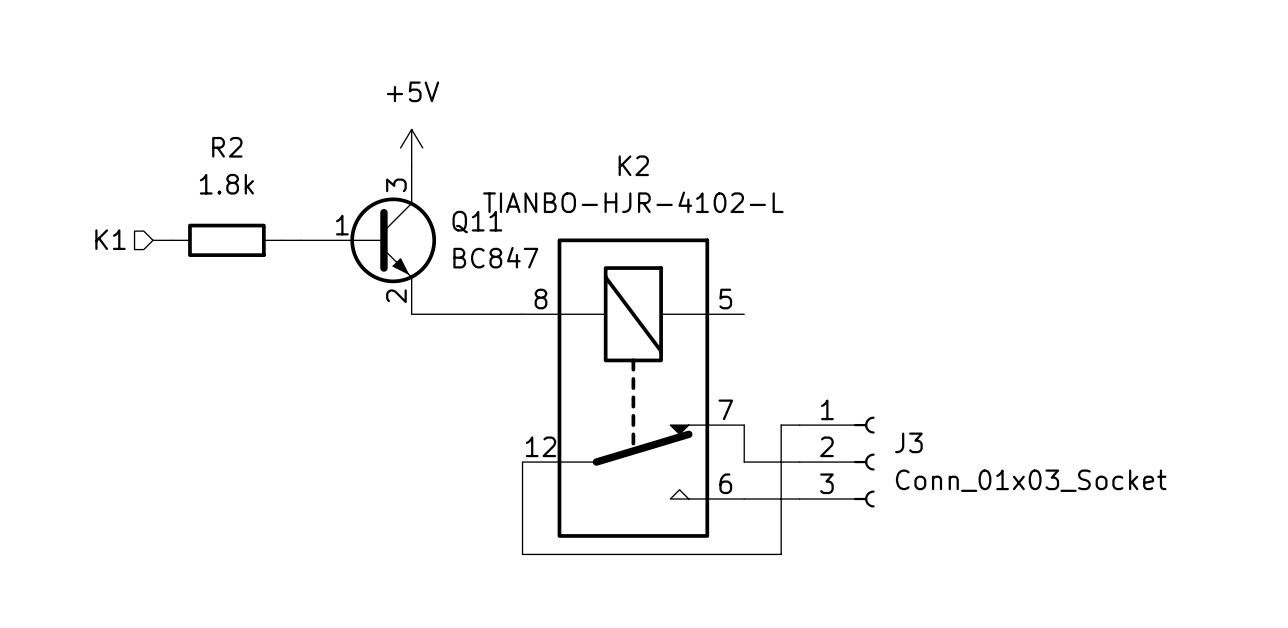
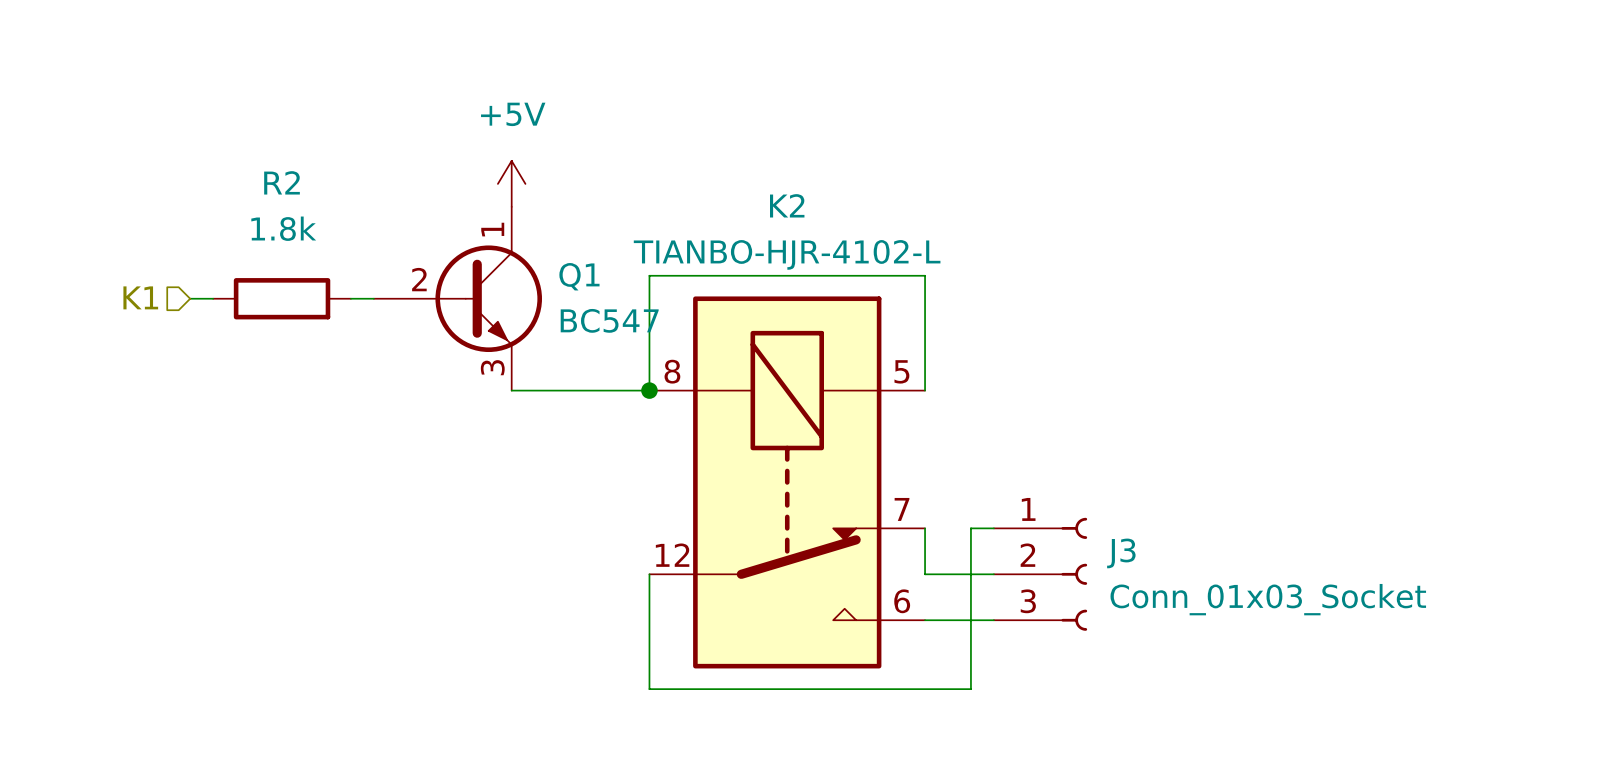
Q11: BC847 (368, 240) -> none
Q1: none -> BC547 (457, 298)
wire: none -> (649, 390) (649, 275) (925, 275) (925, 390)
junction: none -> (649, 390)

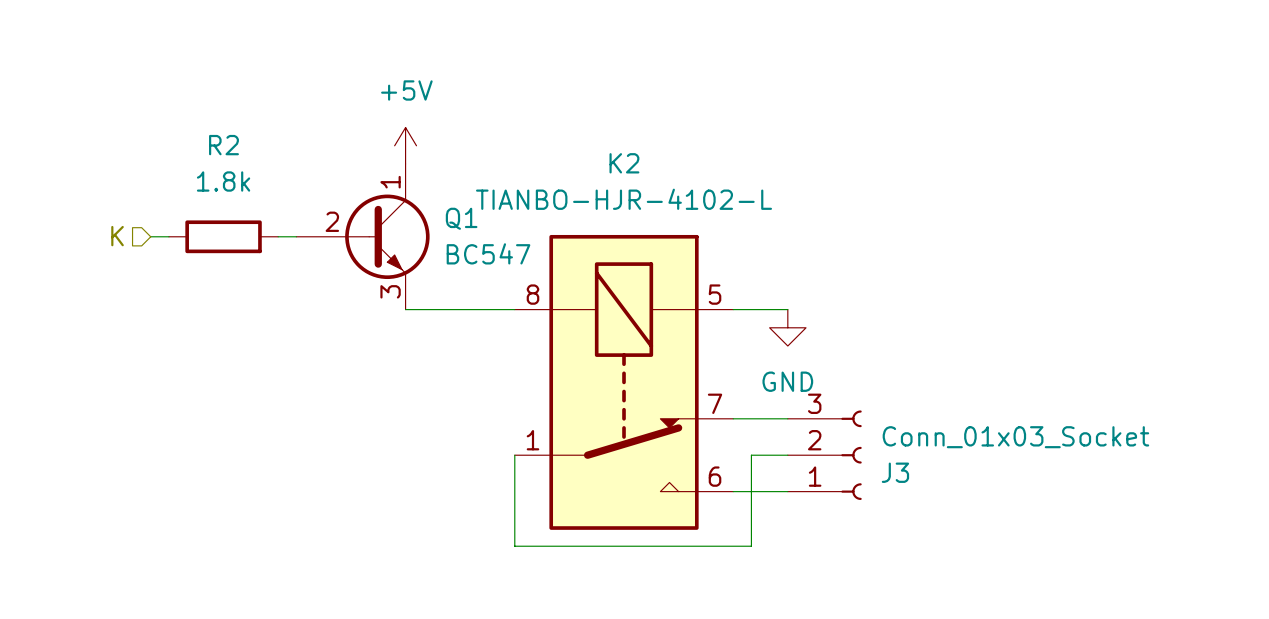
hierarchical label: K1 (140, 297) -> K (117, 236)
wire: (649, 390) (649, 275) (925, 275) (925, 390) -> (787, 309) (733, 309)
junction: (649, 390) -> none
power symbol: none -> GND (787, 327)
wire: (925, 528) (925, 574) (948, 574) -> (733, 418) (769, 418)
wire: (970, 528) (970, 689) (948, 689) -> (751, 455) (751, 546)
K2 pin number: 12 (672, 555) -> 1 (532, 440)
J3 flip: as is (1074, 574) -> up-down (851, 455)

